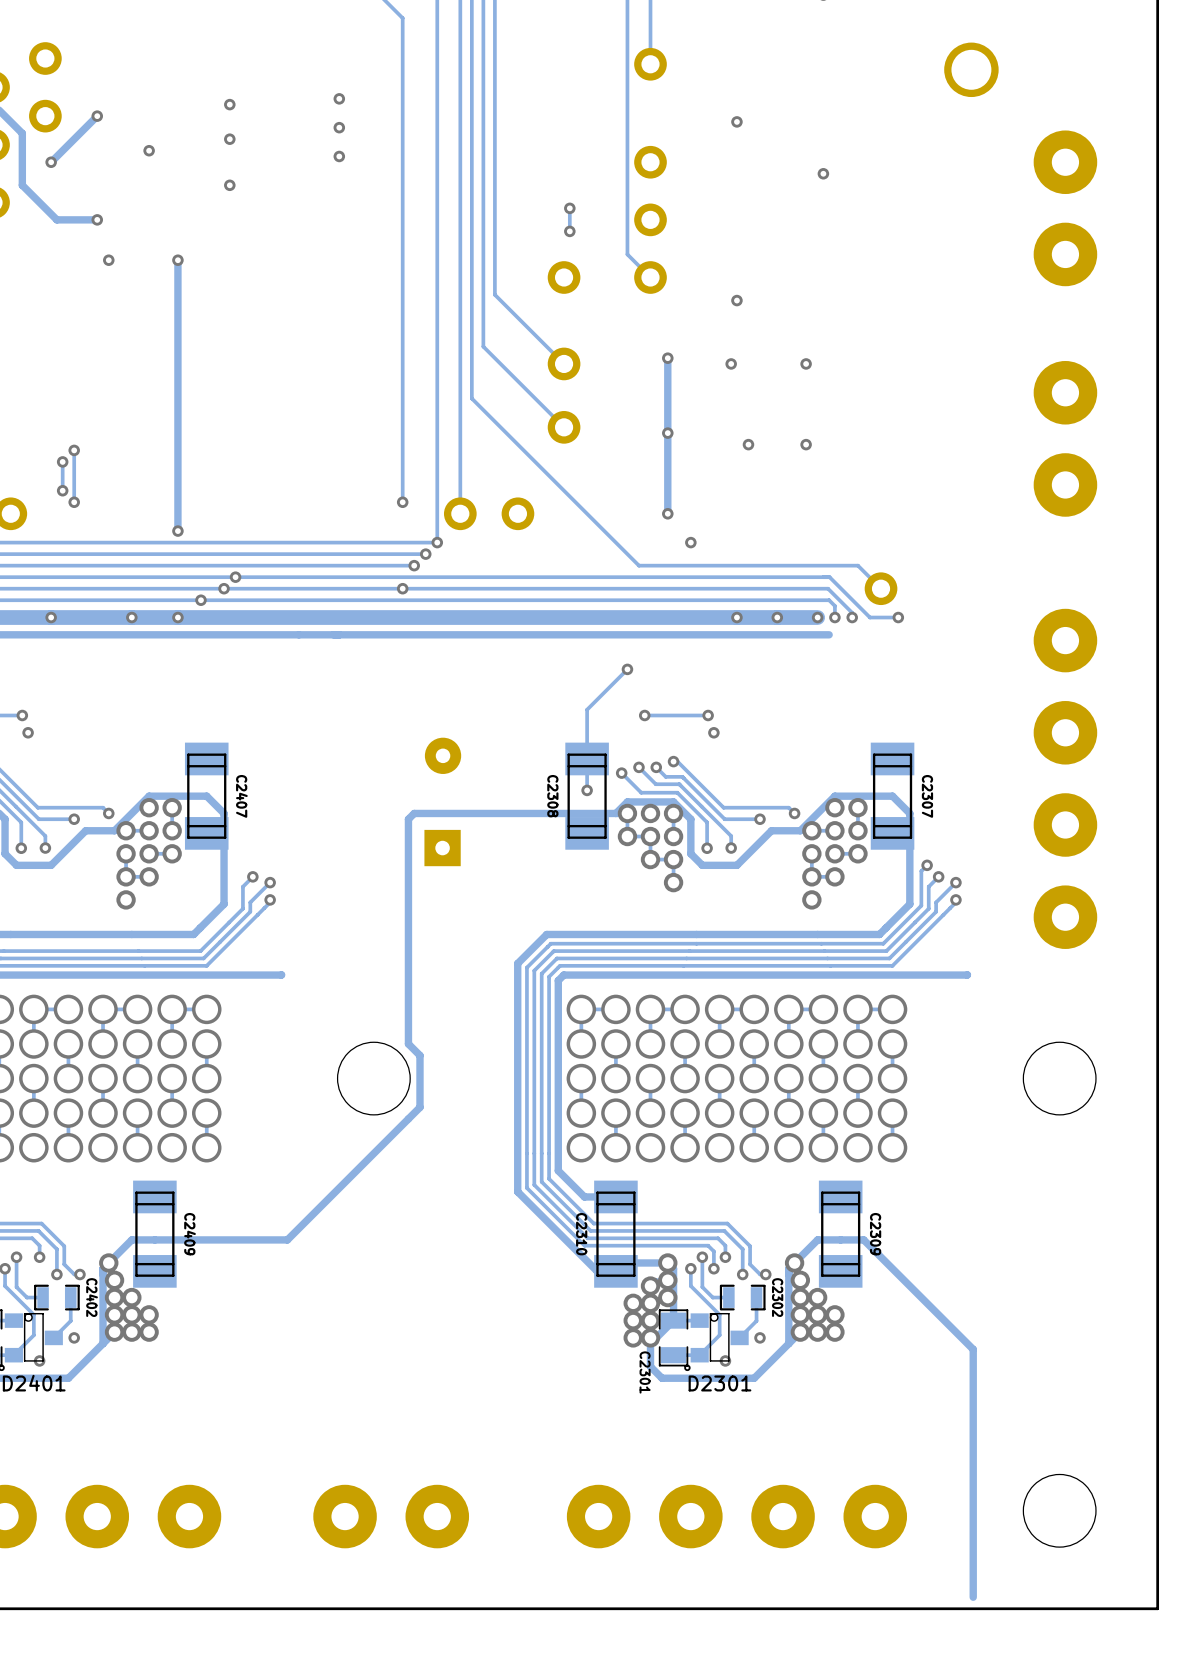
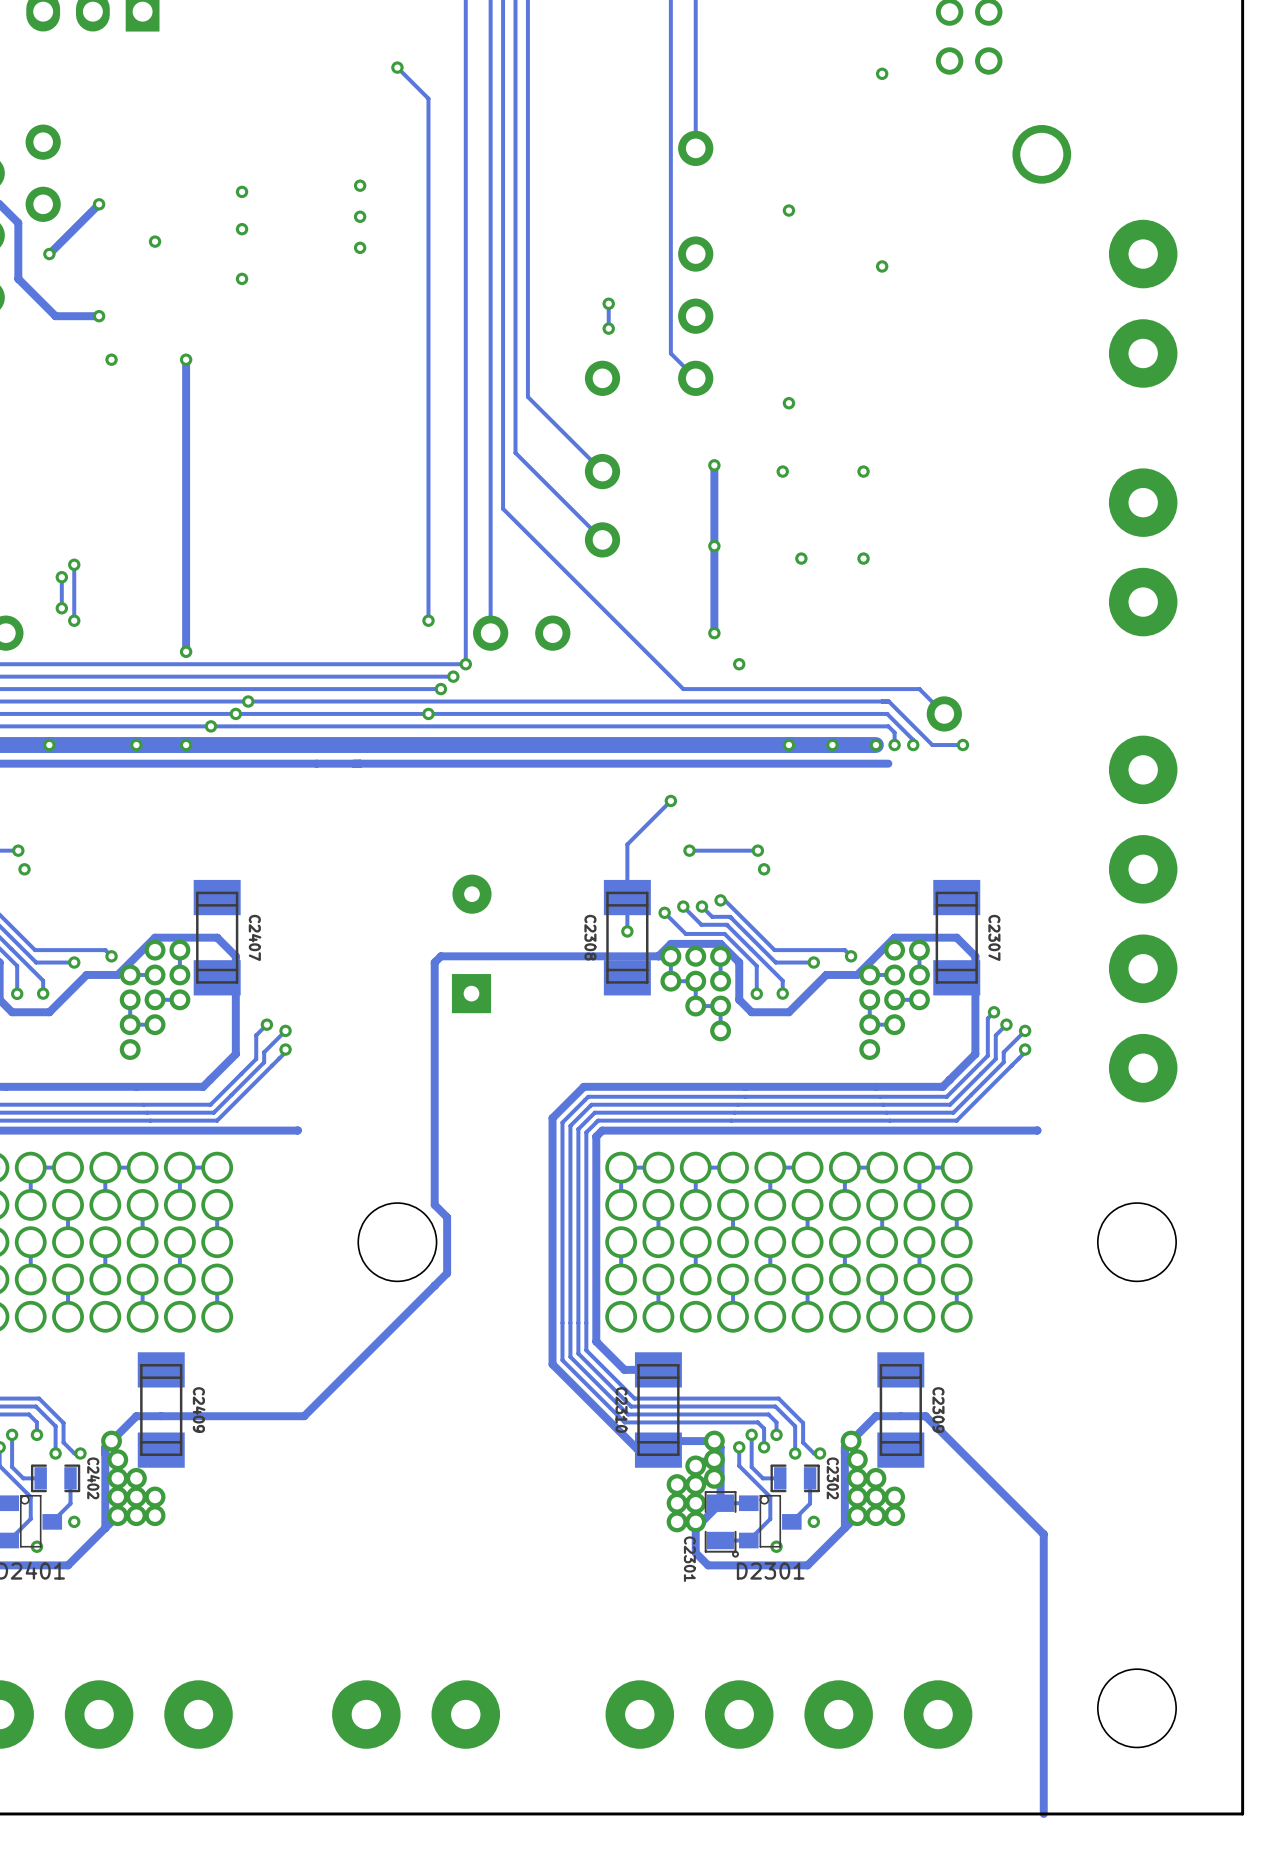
track: none -> (1043, 1801) (1043, 1813)

